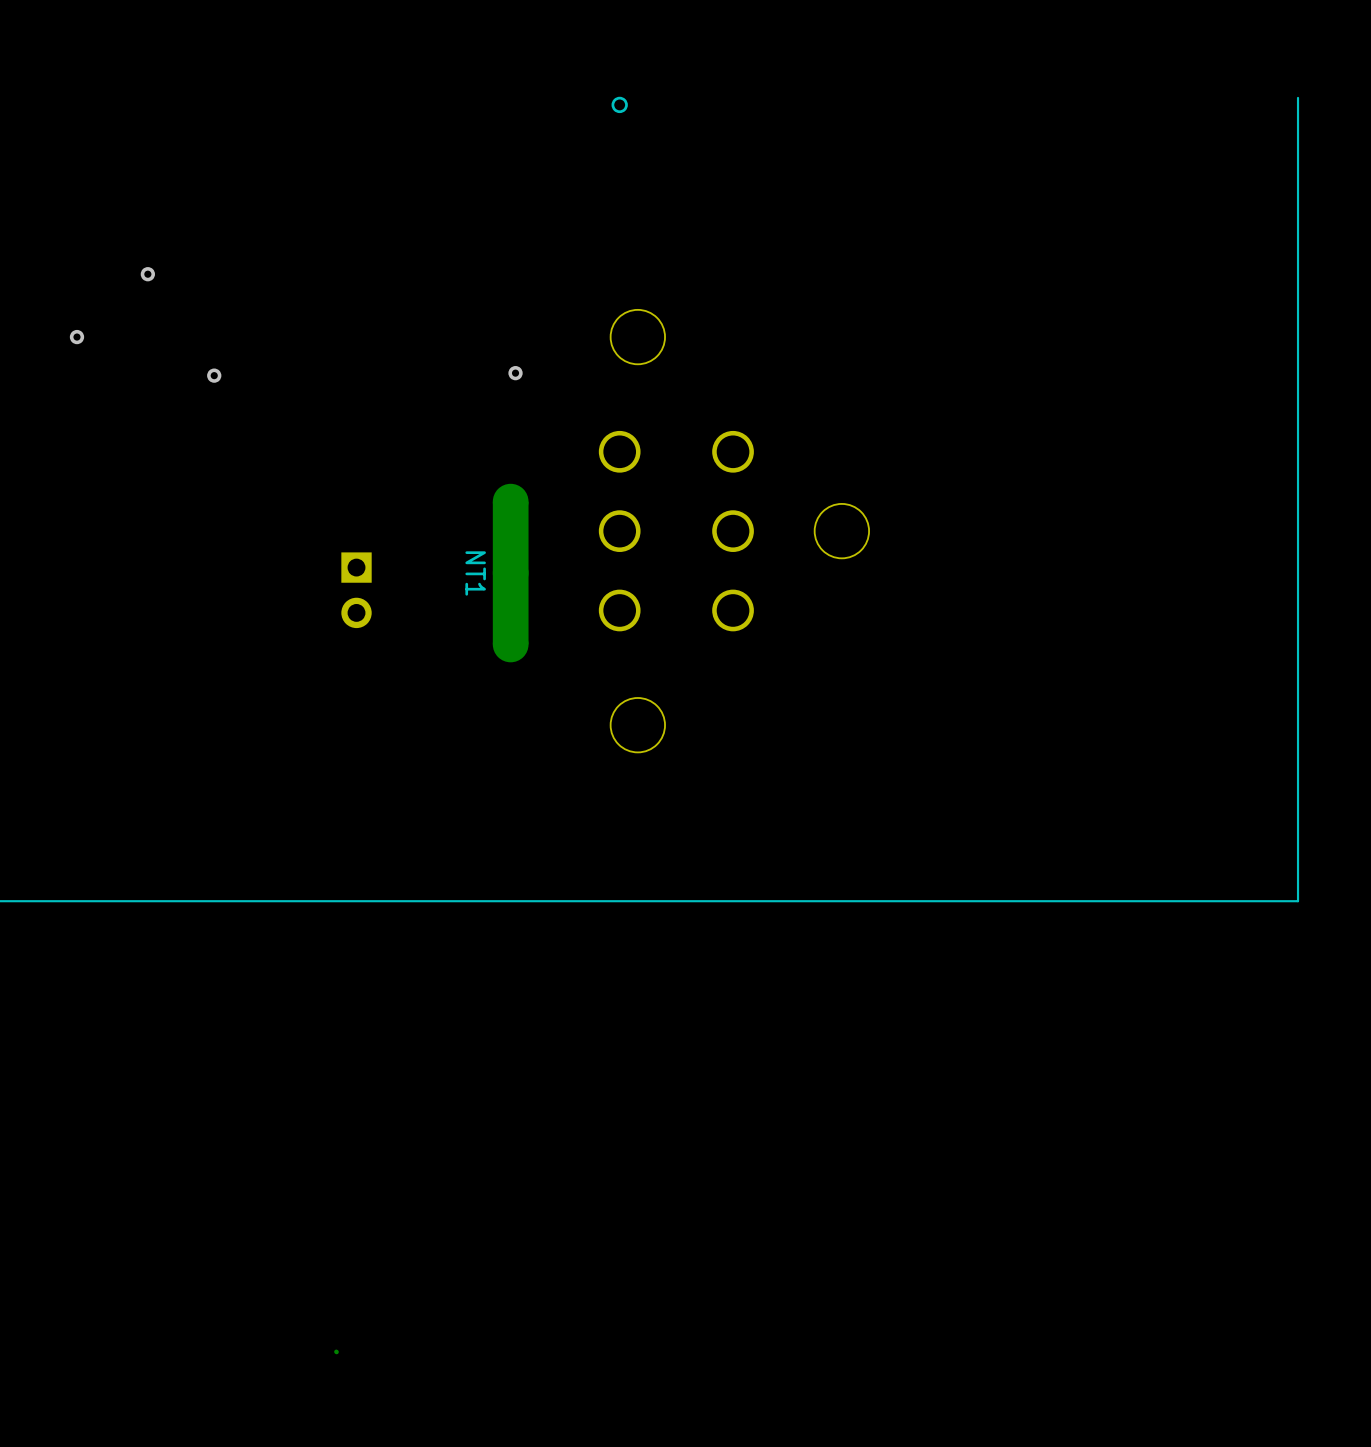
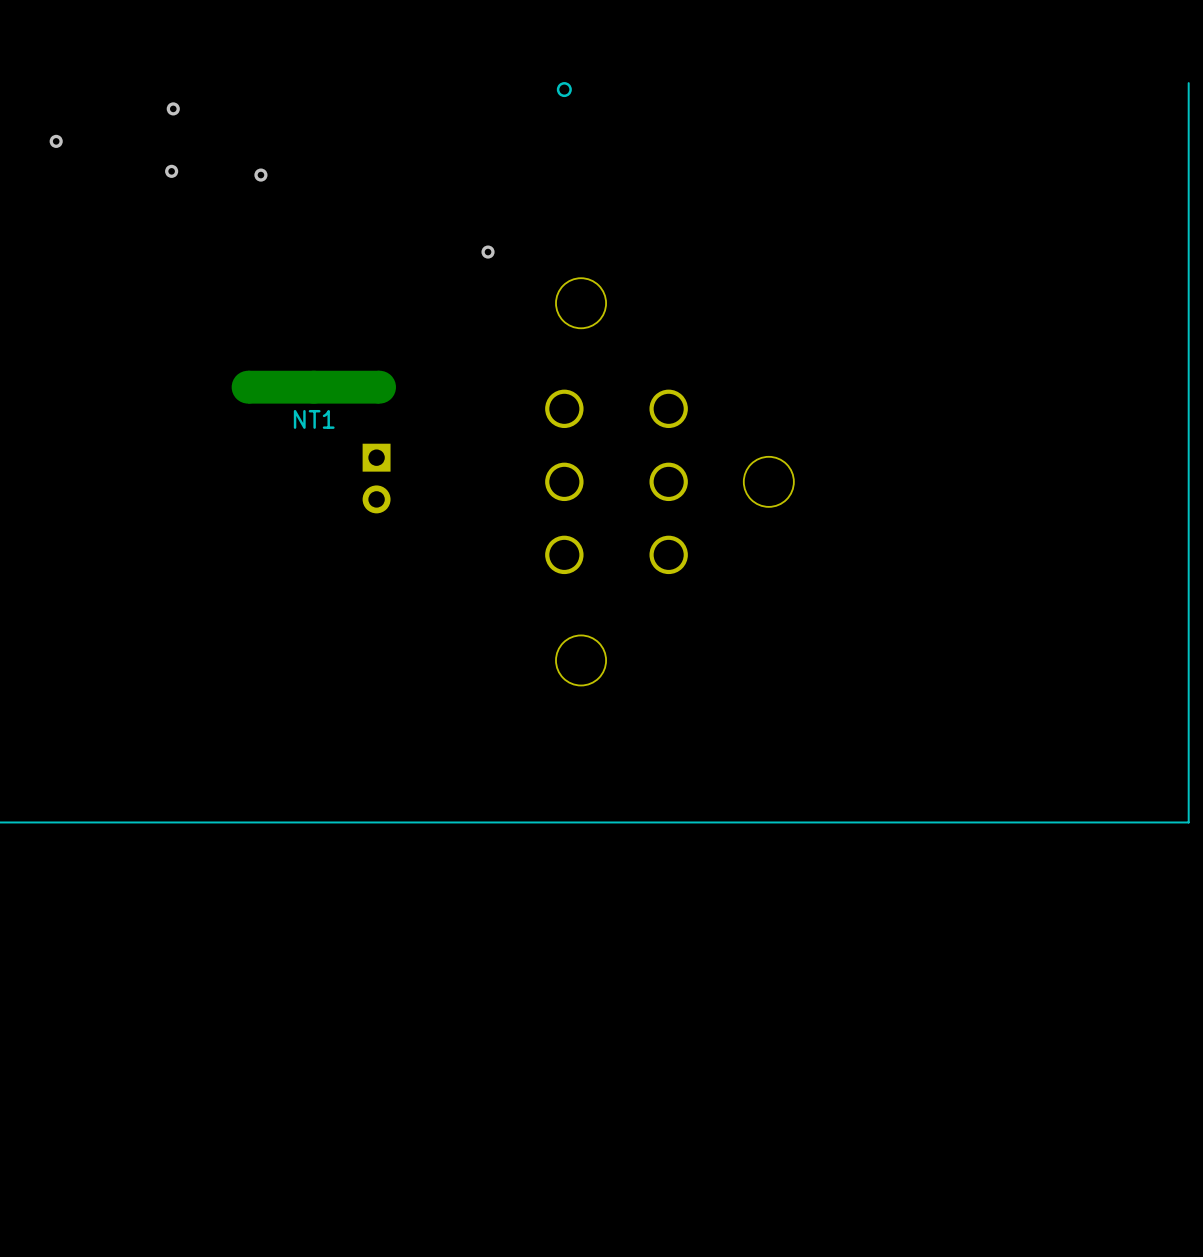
via: none -> (173, 108)
via: none -> (56, 141)
via: none -> (171, 171)
via: none -> (260, 175)
via: (147, 274) -> none
via: (76, 337) -> none
via position: (515, 373) -> (488, 252)
via: (214, 375) -> none
NT1 name position: NT1 (475, 573) -> NT1 (314, 419)
NT1 rotation: 0° (510, 573) -> 90° clockwise (313, 387)
NT1 position: (510, 573) -> (313, 387)
part position: (356, 590) -> (376, 478)
track: (336, 1351) (336, 1352) -> none

